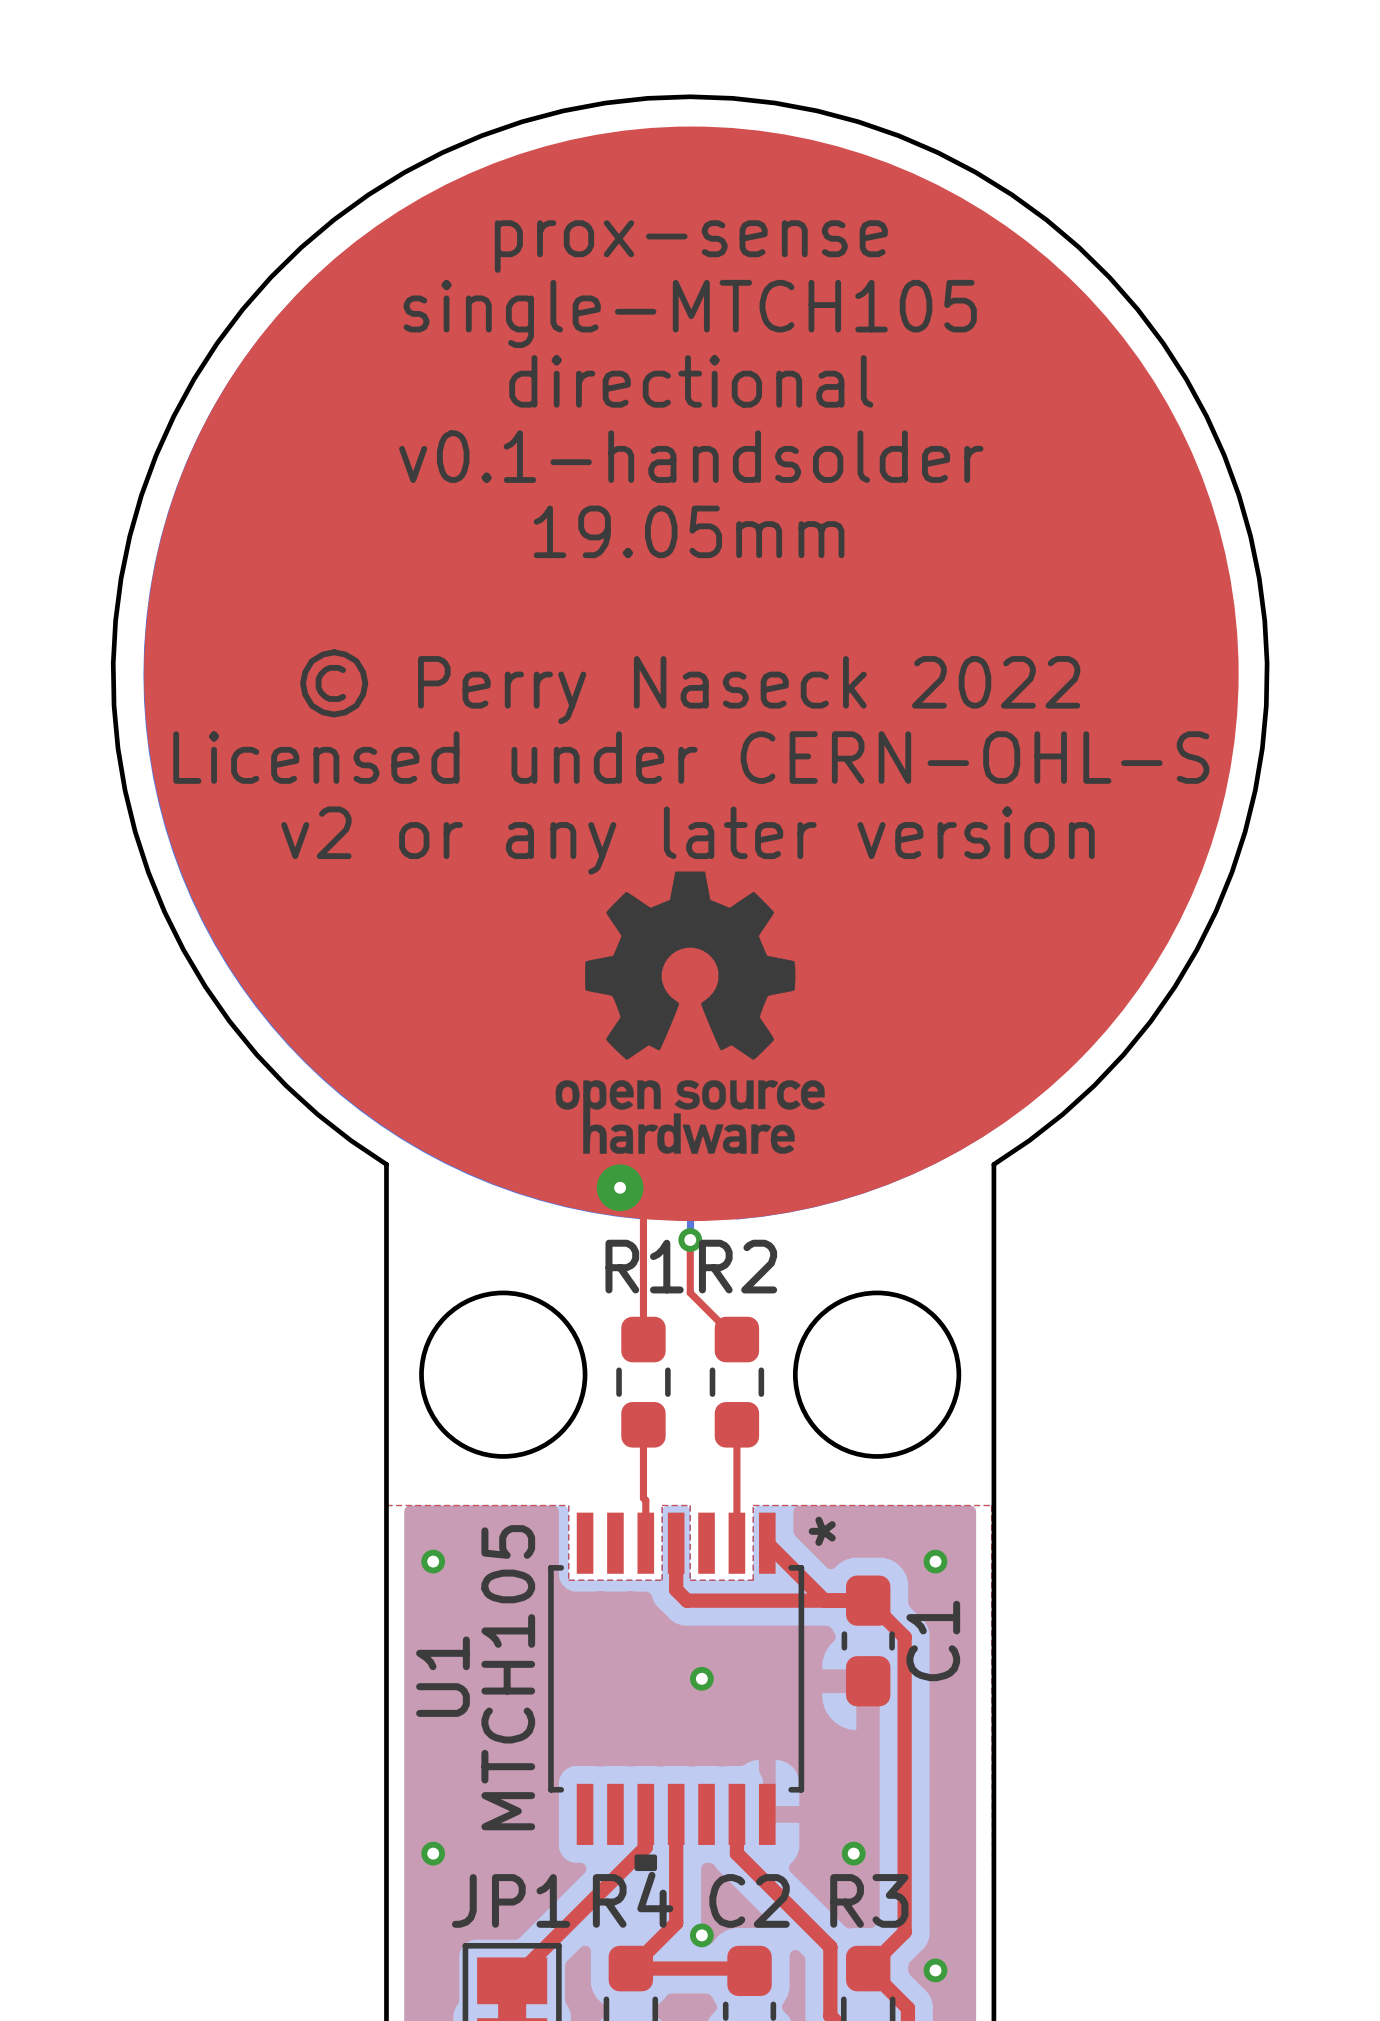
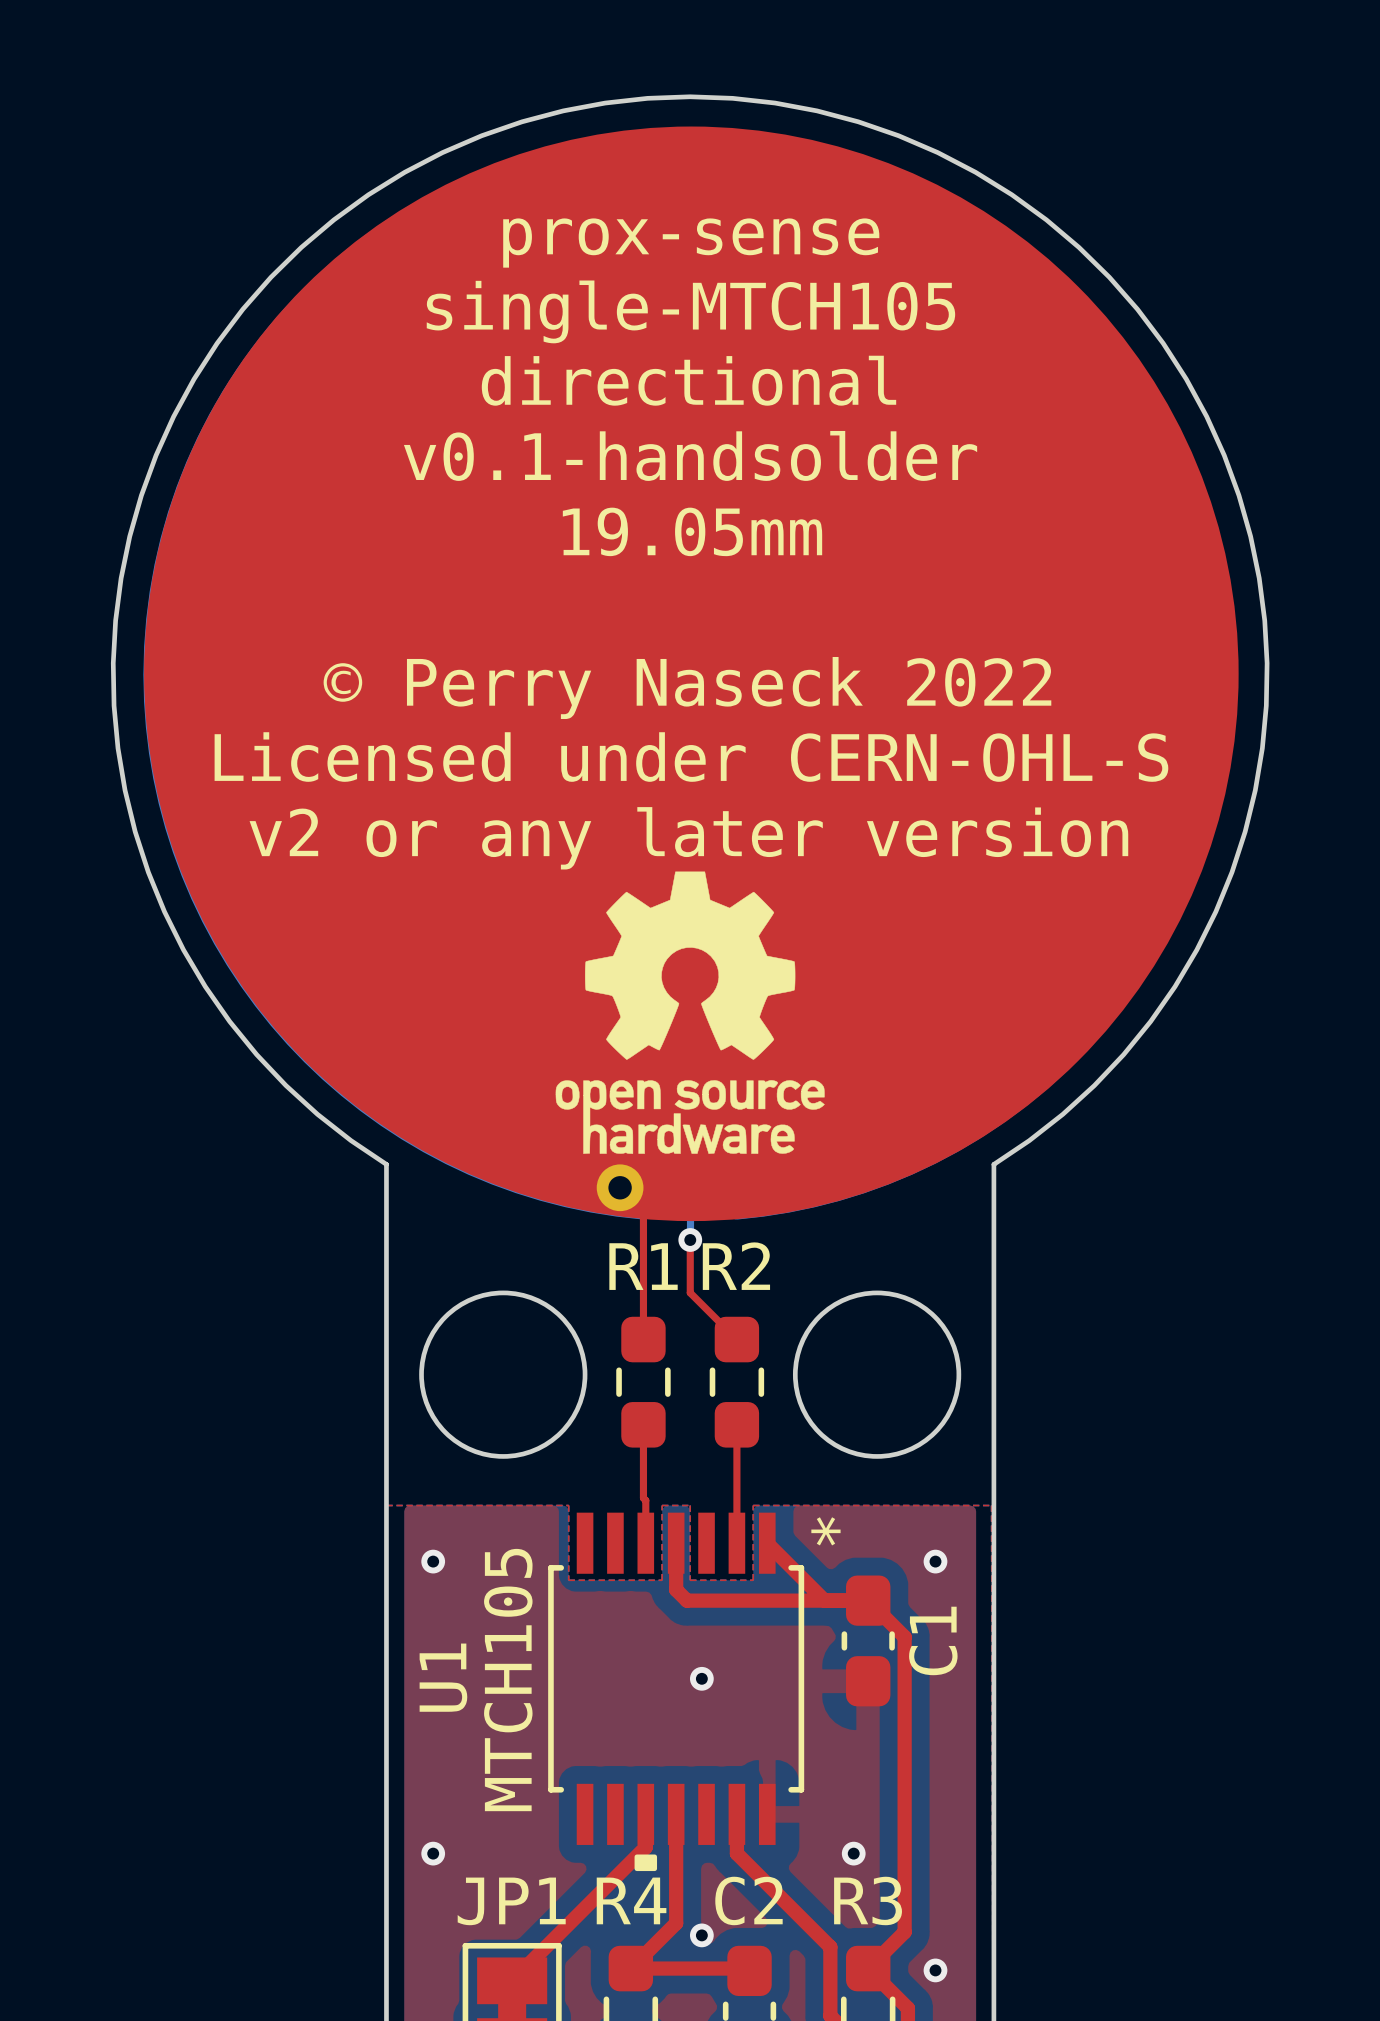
part footprint: [143, 126, 1239, 1222] -> [143, 126, 1239, 1222]

